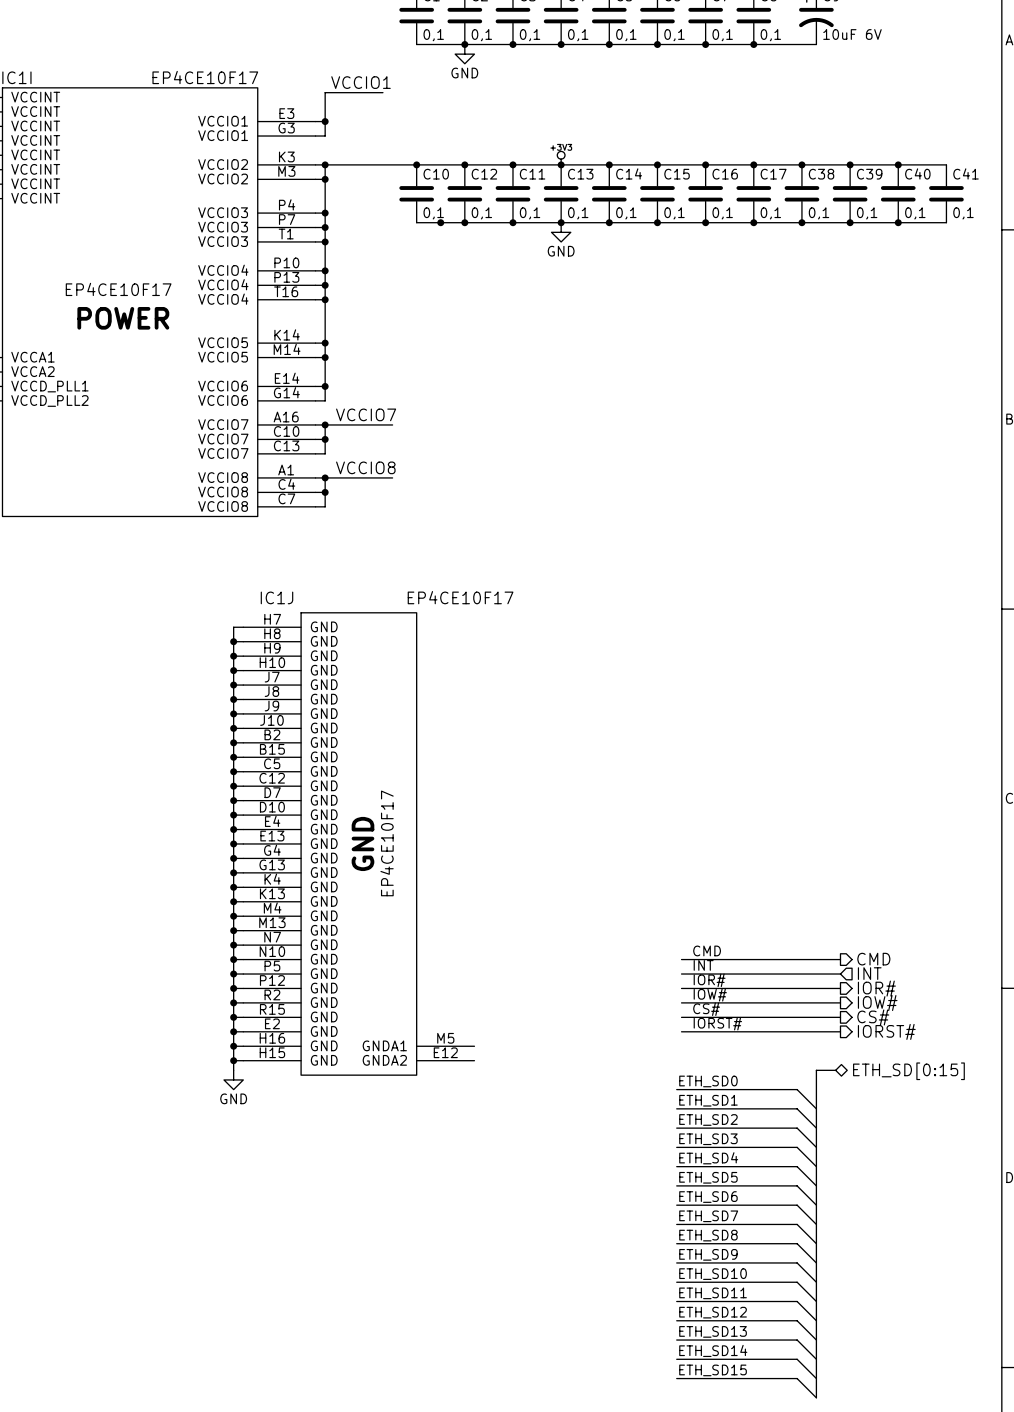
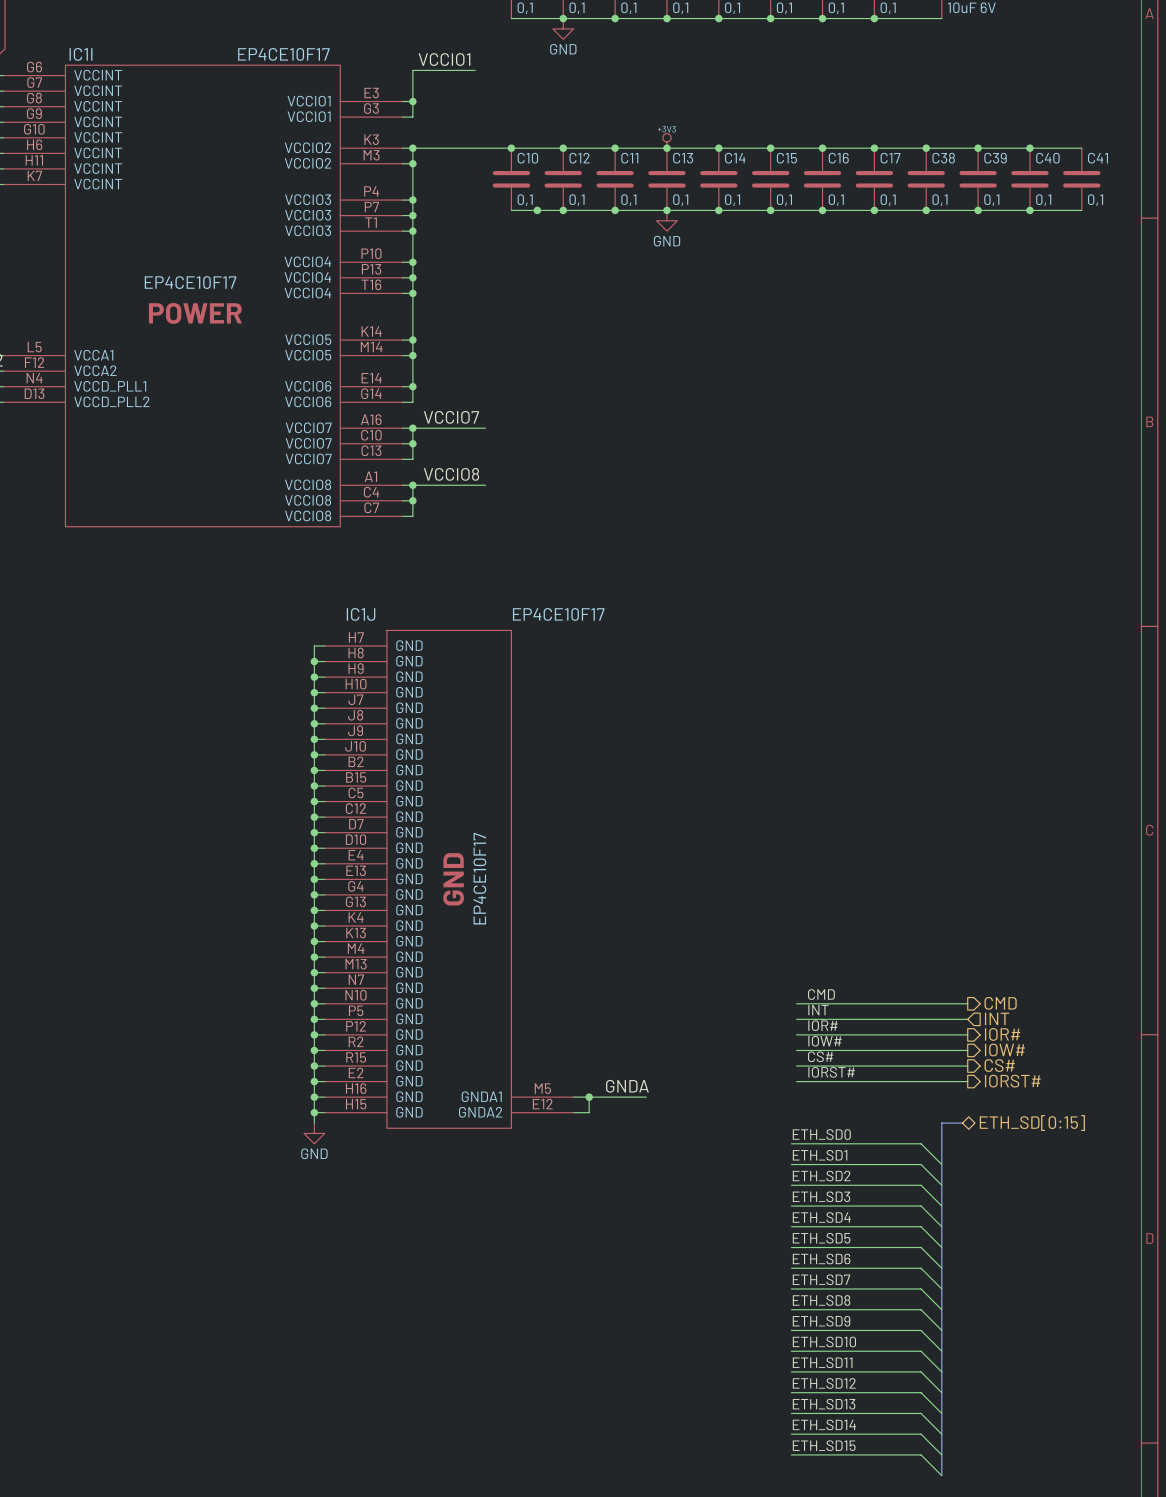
label: none -> GNDA (627, 1086)
wire: none -> (573, 1097) (646, 1097)
wire: none -> (589, 1097) (589, 1112) (573, 1112)
junction: none -> (589, 1097)

